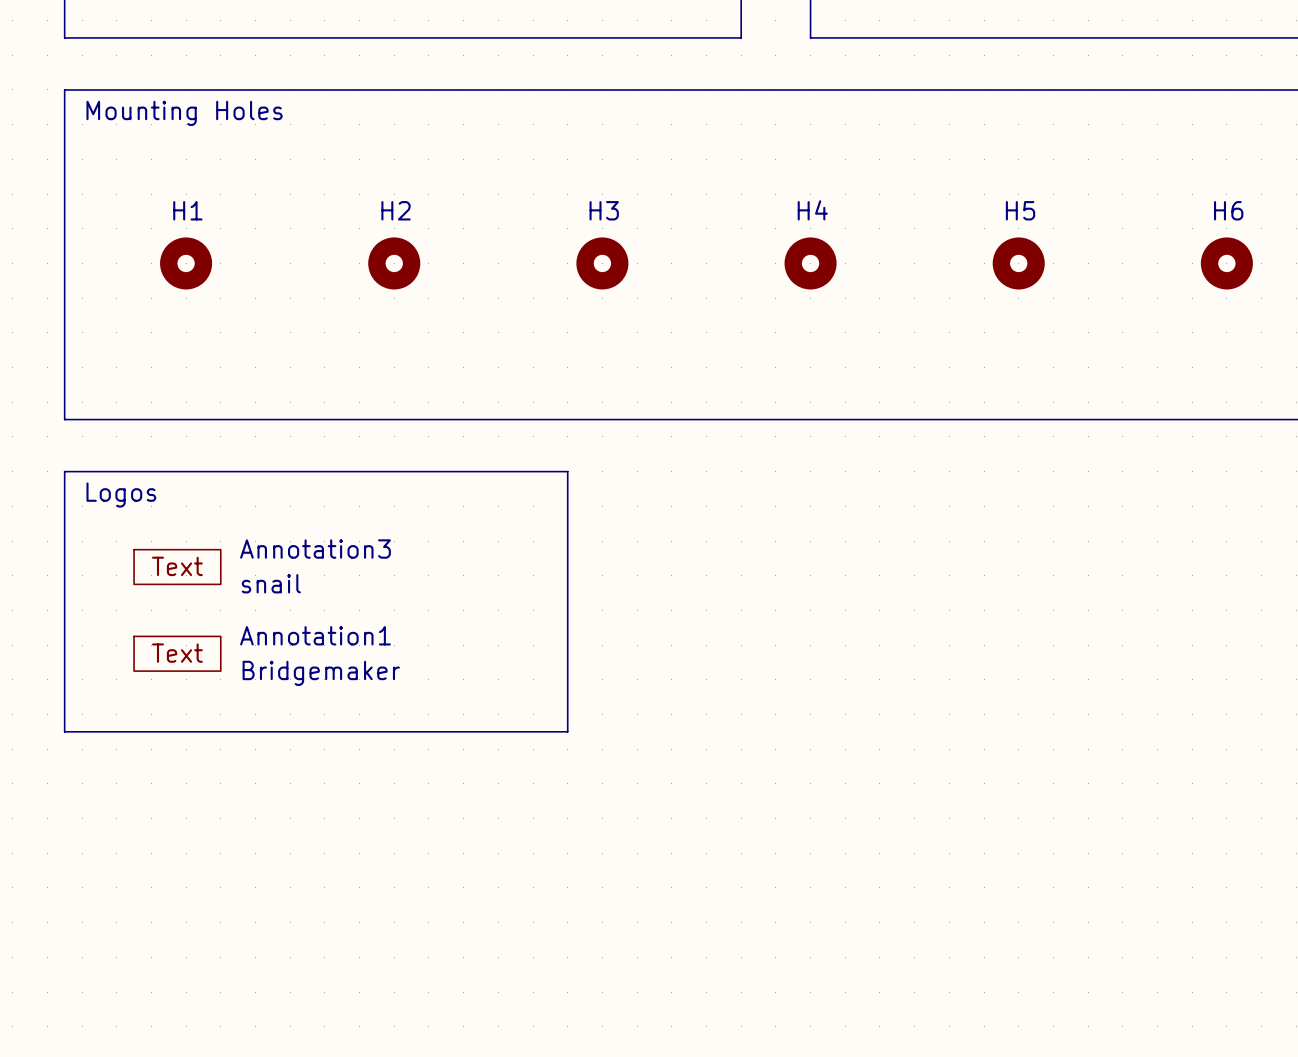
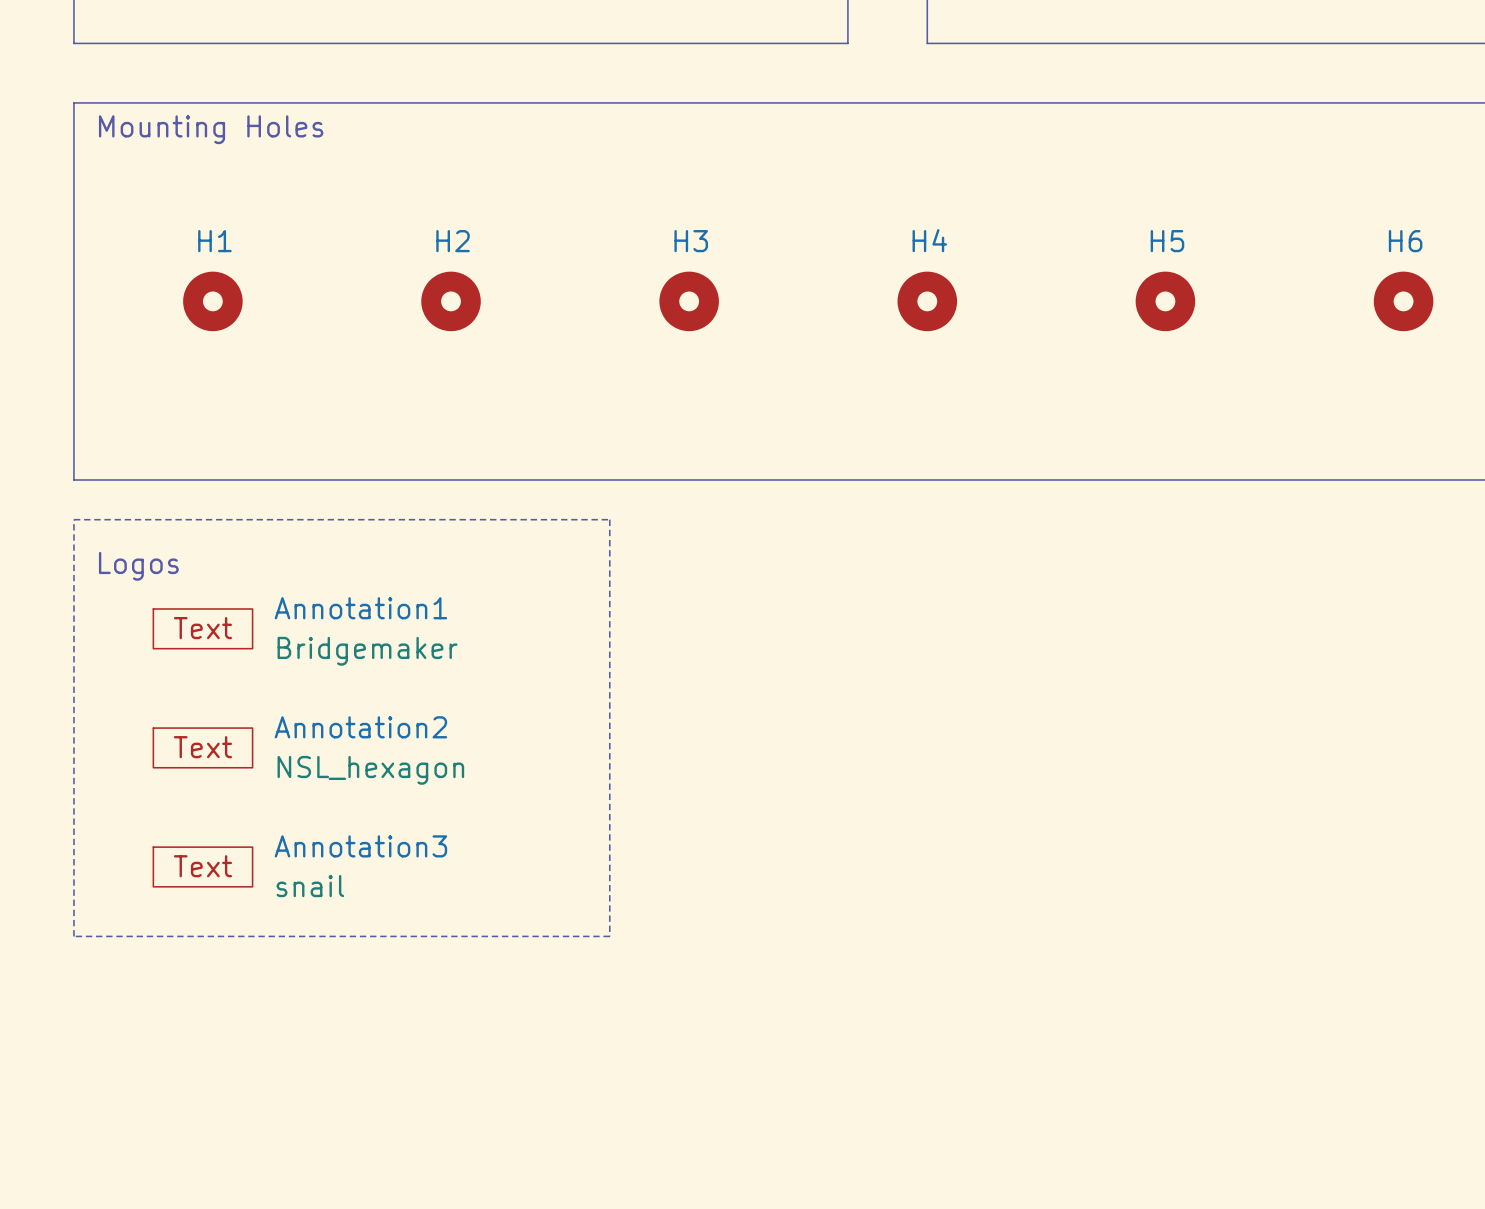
line: (64, 471) (64, 731) (567, 731) (567, 471) (64, 471) -> (73, 519) (73, 936) (609, 936) (609, 519) (73, 519)
Annotation1: none -> Bridgemaker (202, 628)
Annotation3 position: (177, 567) -> (202, 866)
Annotation1 name: Annotation1 (315, 635) -> Annotation2 (360, 727)
Annotation1 value: Bridgemaker (321, 673) -> NSL_hexagon (370, 770)

